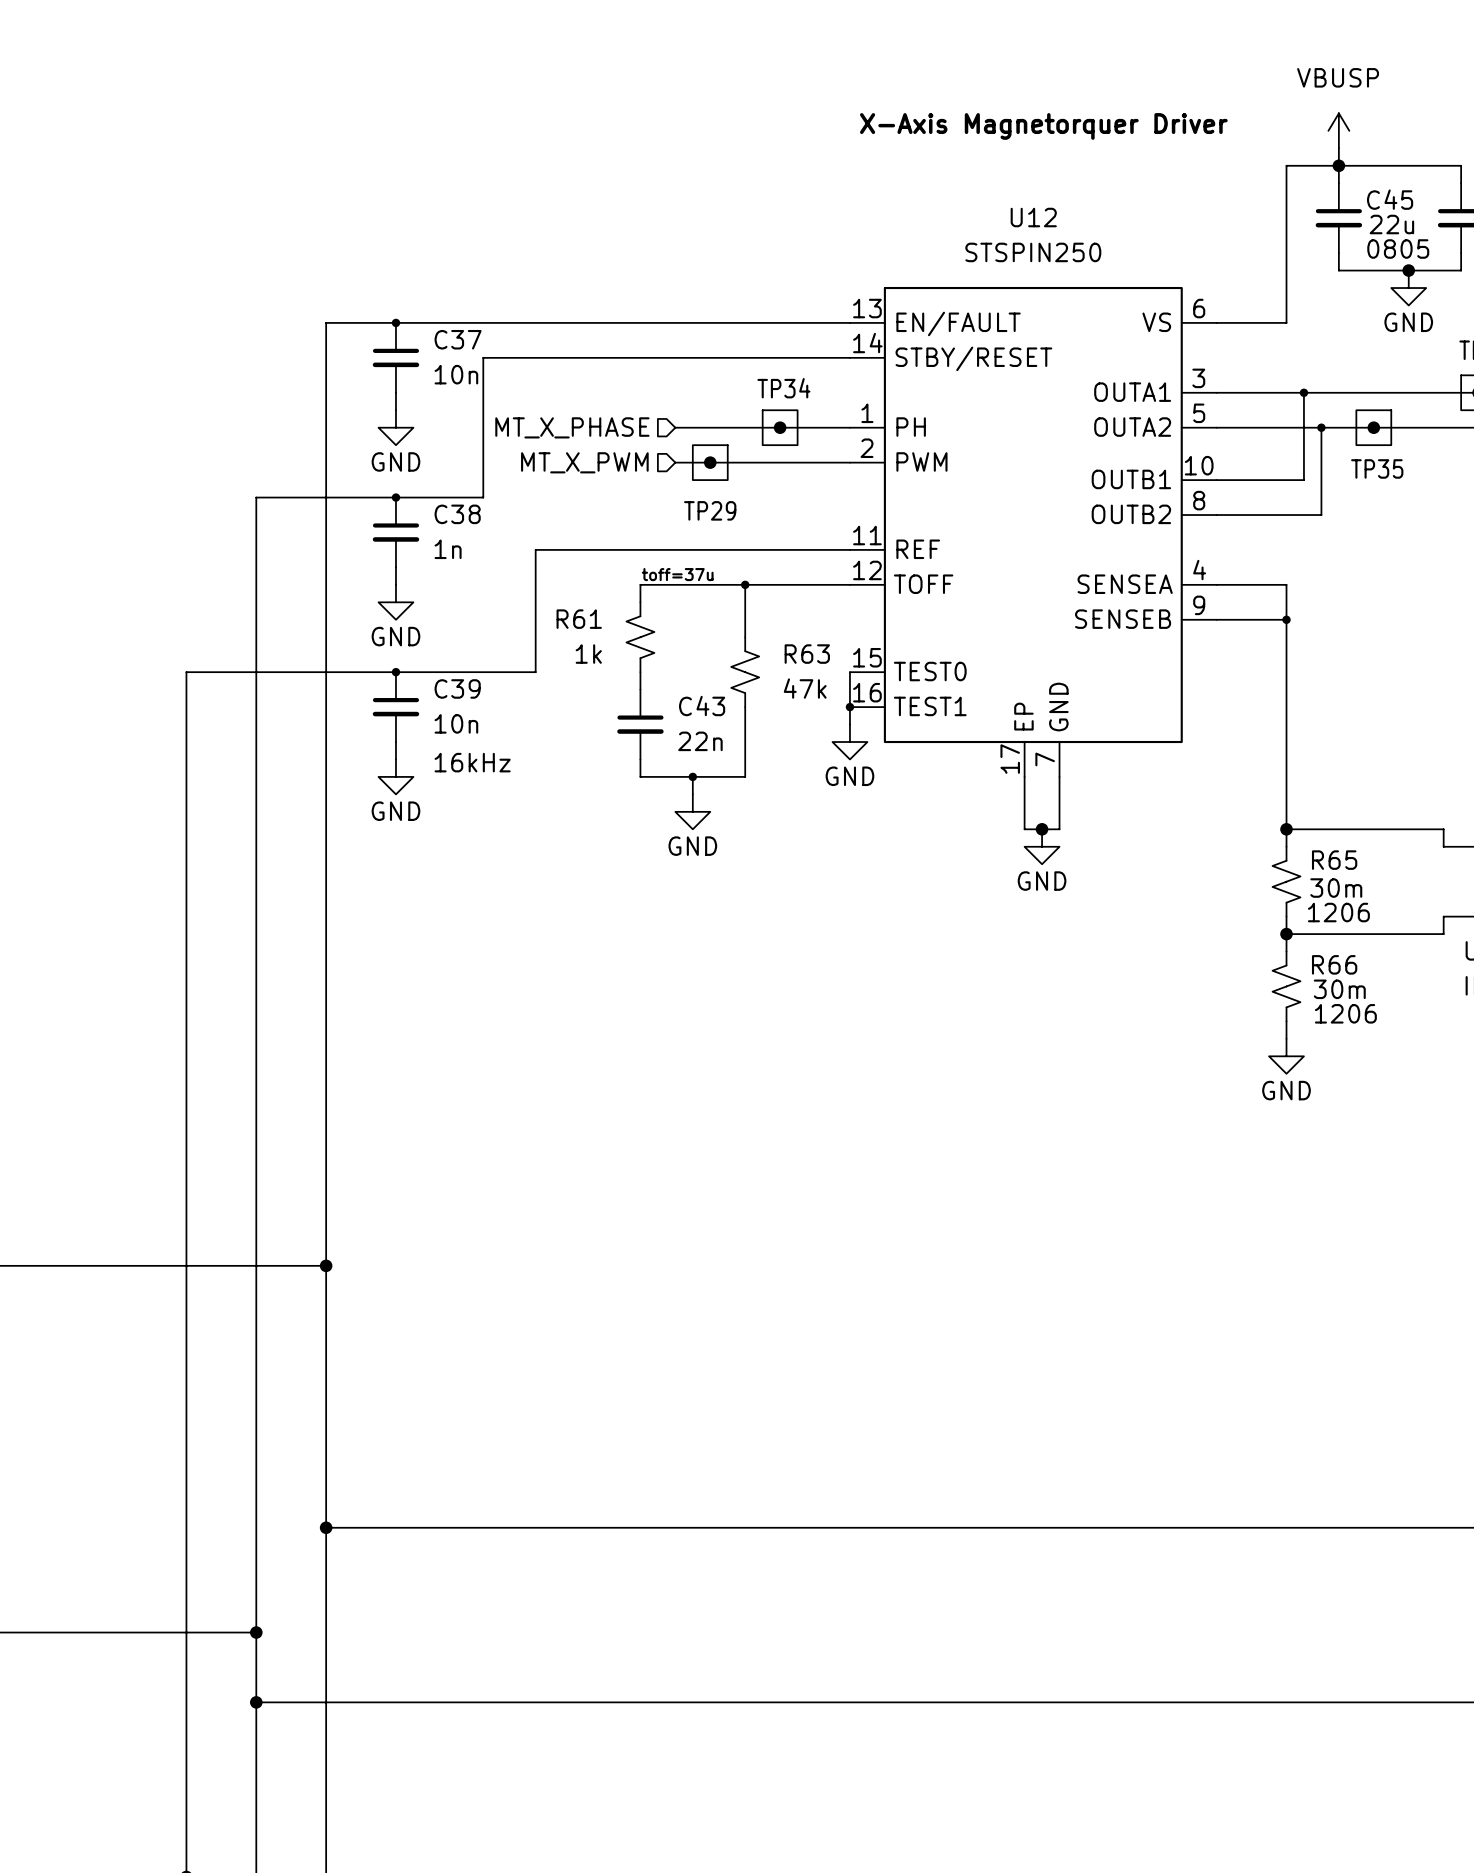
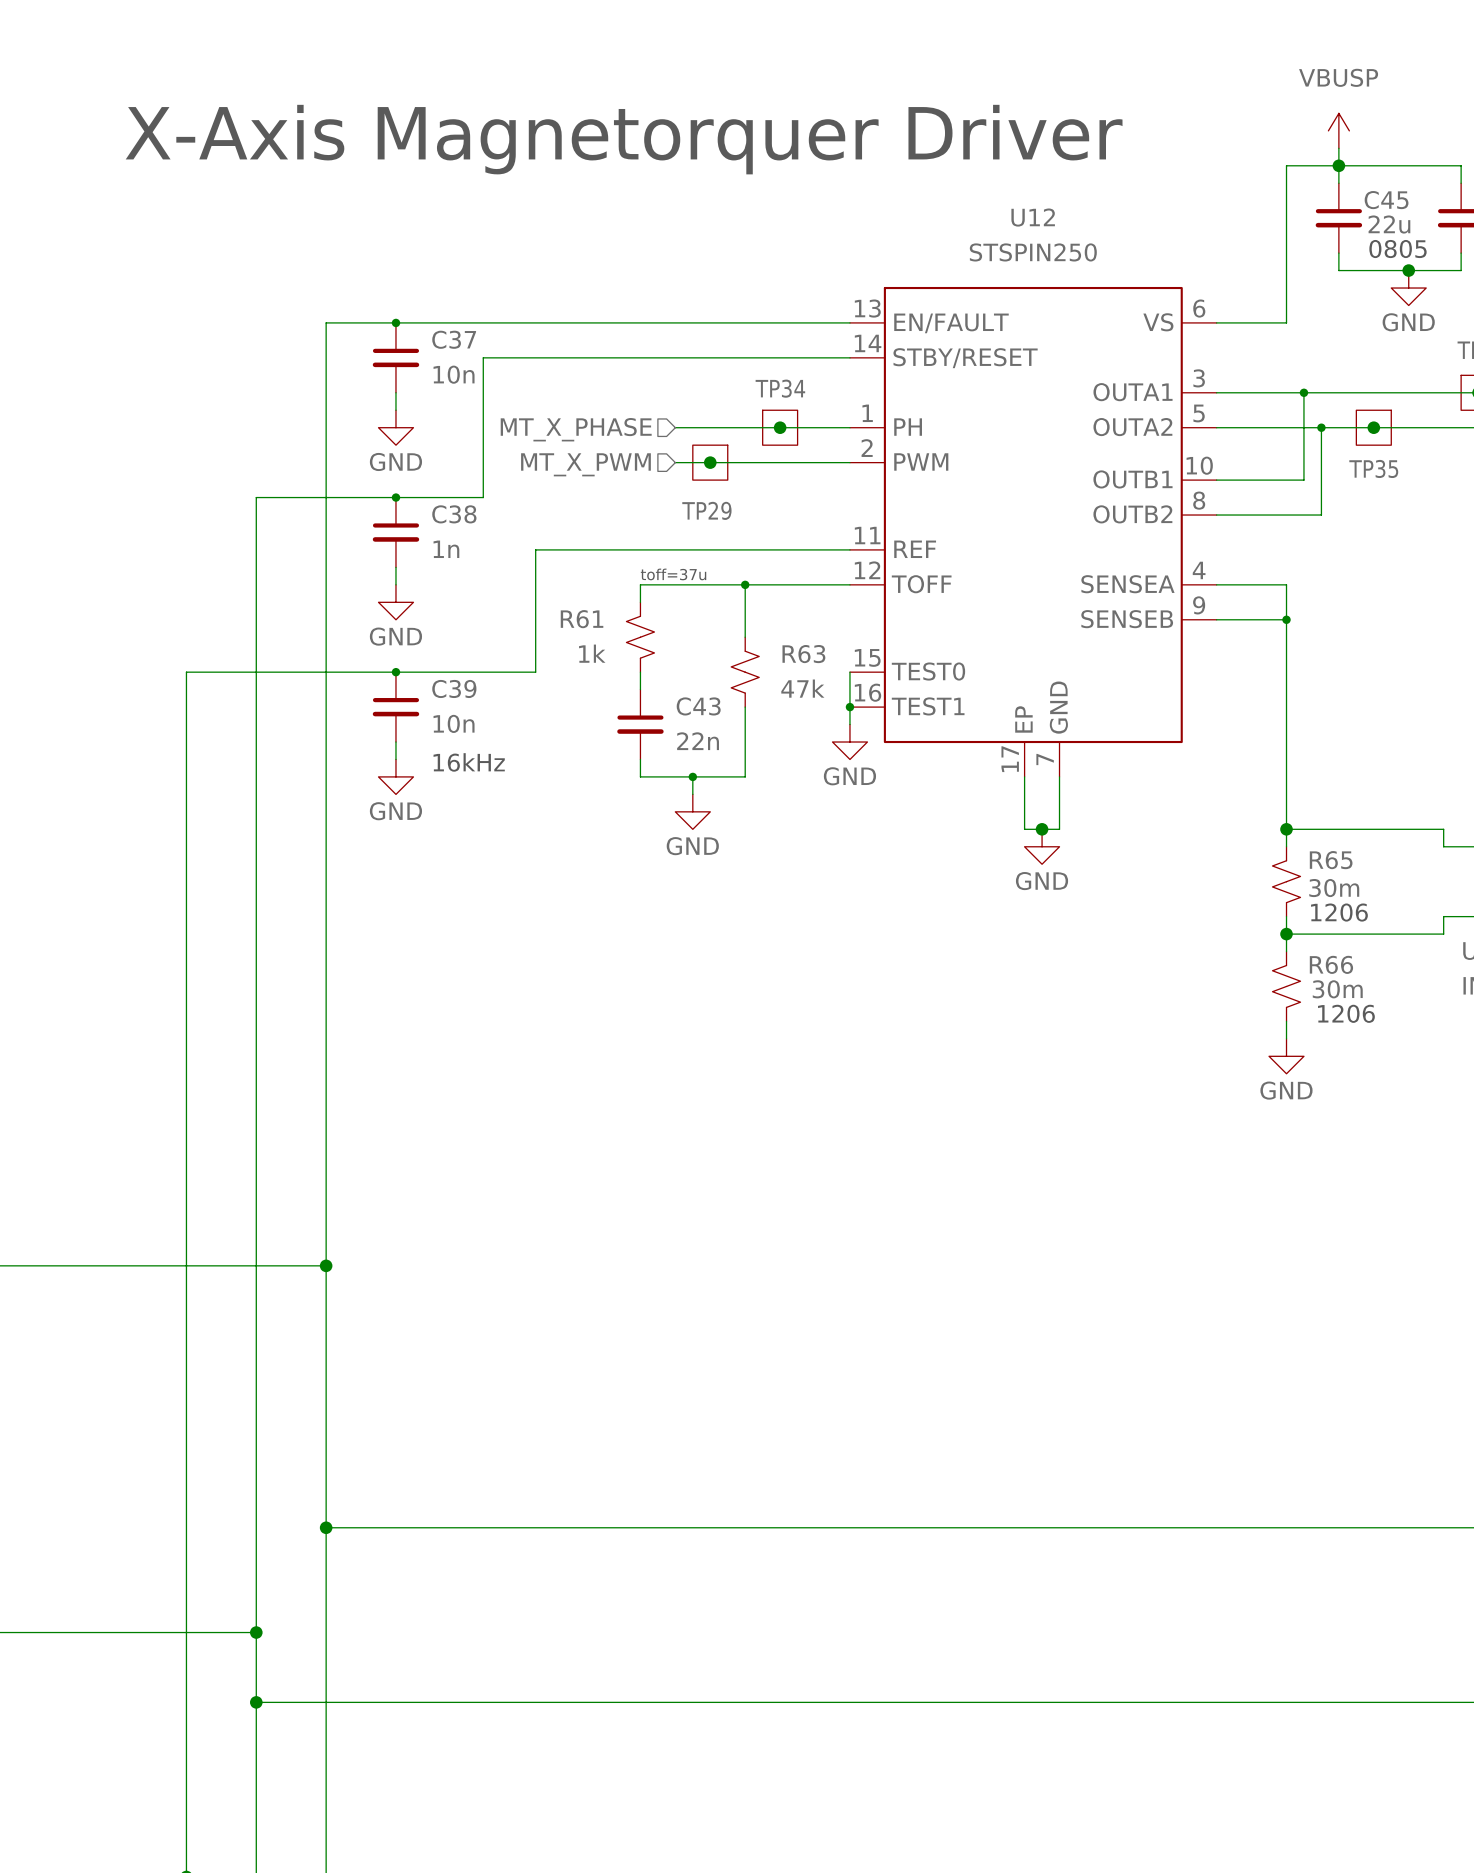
text: X-Axis Magnetorquer Driver (1043, 126) -> none
text: none -> X-Axis Magnetorquer Driver (624, 139)

